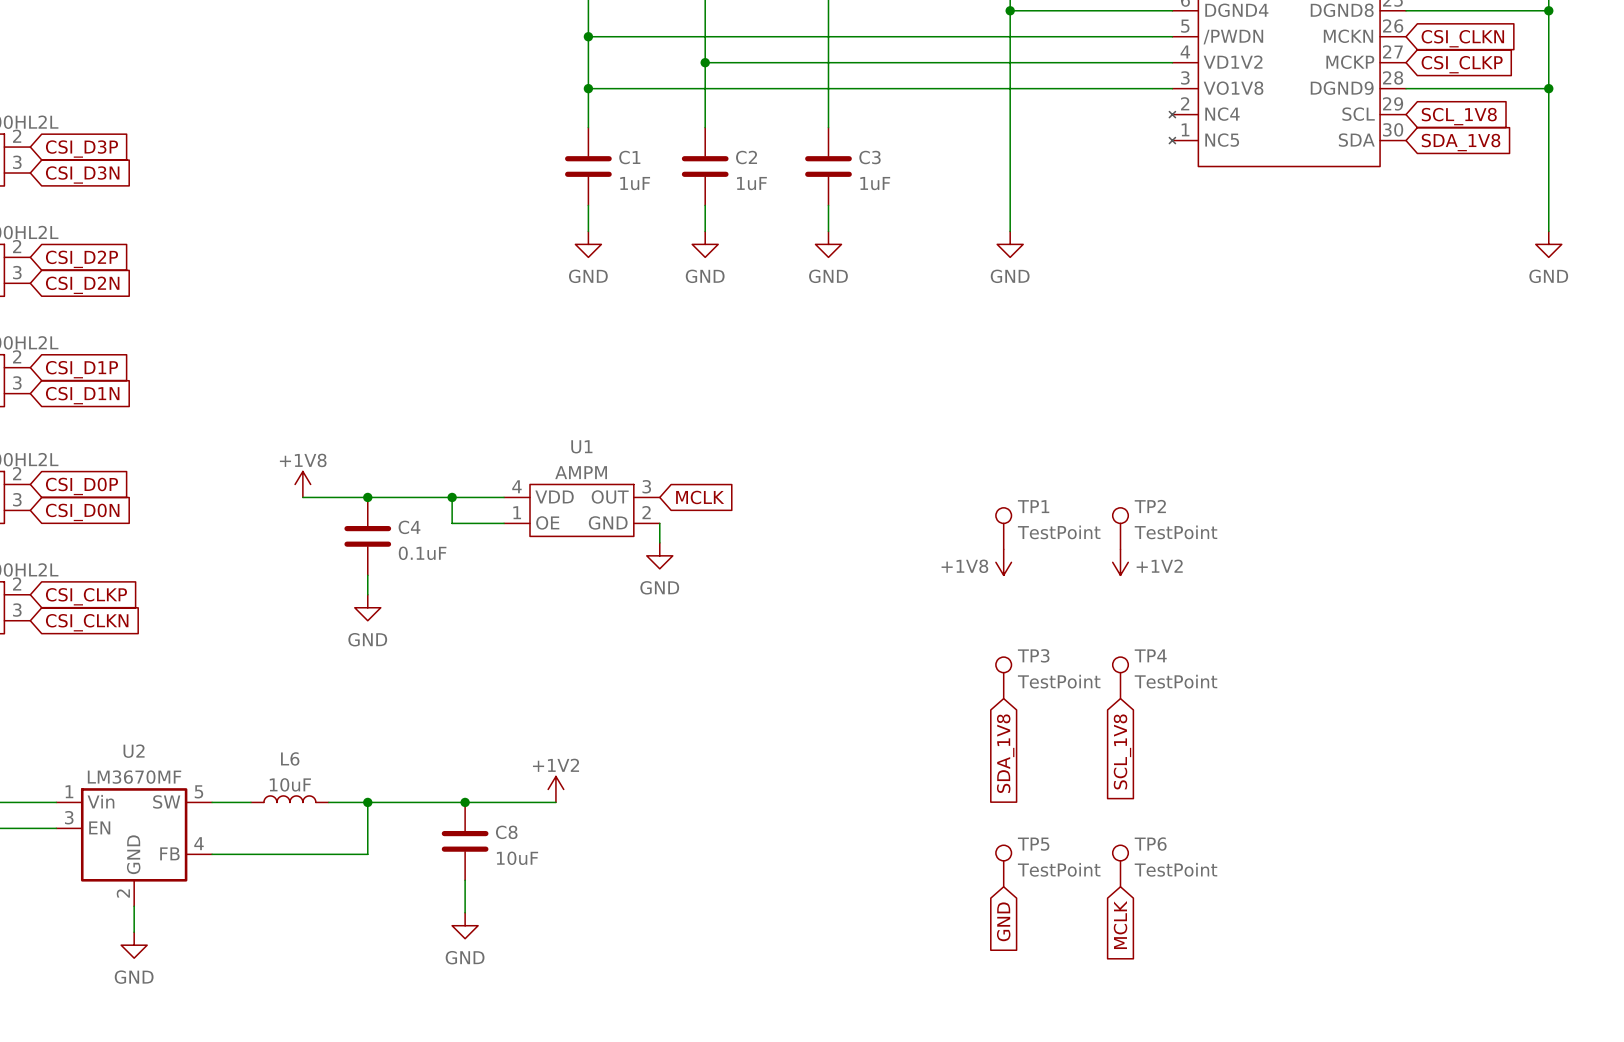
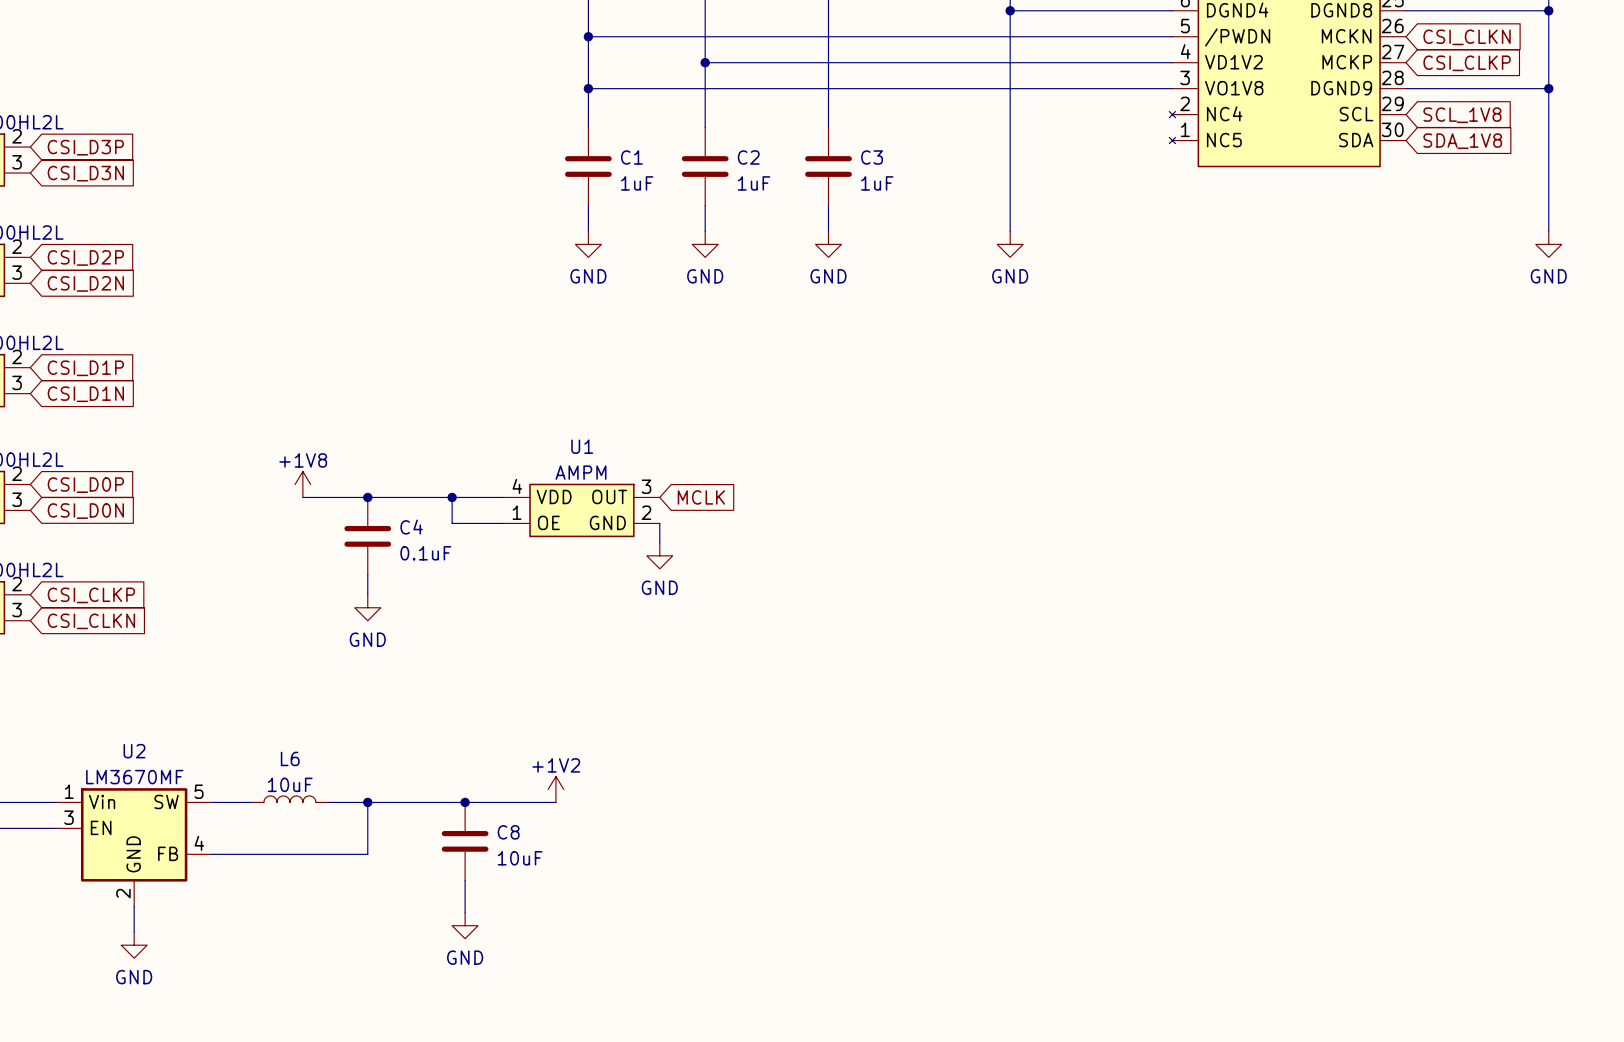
TP1: TestPoint (1003, 528) -> none
TP2: TestPoint (1120, 528) -> none
power symbol: +1V8 (1003, 562) -> none
power symbol: +1V2 (1120, 562) -> none
TP3: TestPoint (1003, 677) -> none
TP4: TestPoint (1120, 677) -> none
global label: SCL_1V8 (1122, 751) -> none
global label: SDA_1V8 (1005, 753) -> none
TP5: TestPoint (1003, 866) -> none
TP6: TestPoint (1120, 866) -> none
global label: GND (1003, 921) -> none
global label: MCLK (1120, 925) -> none

